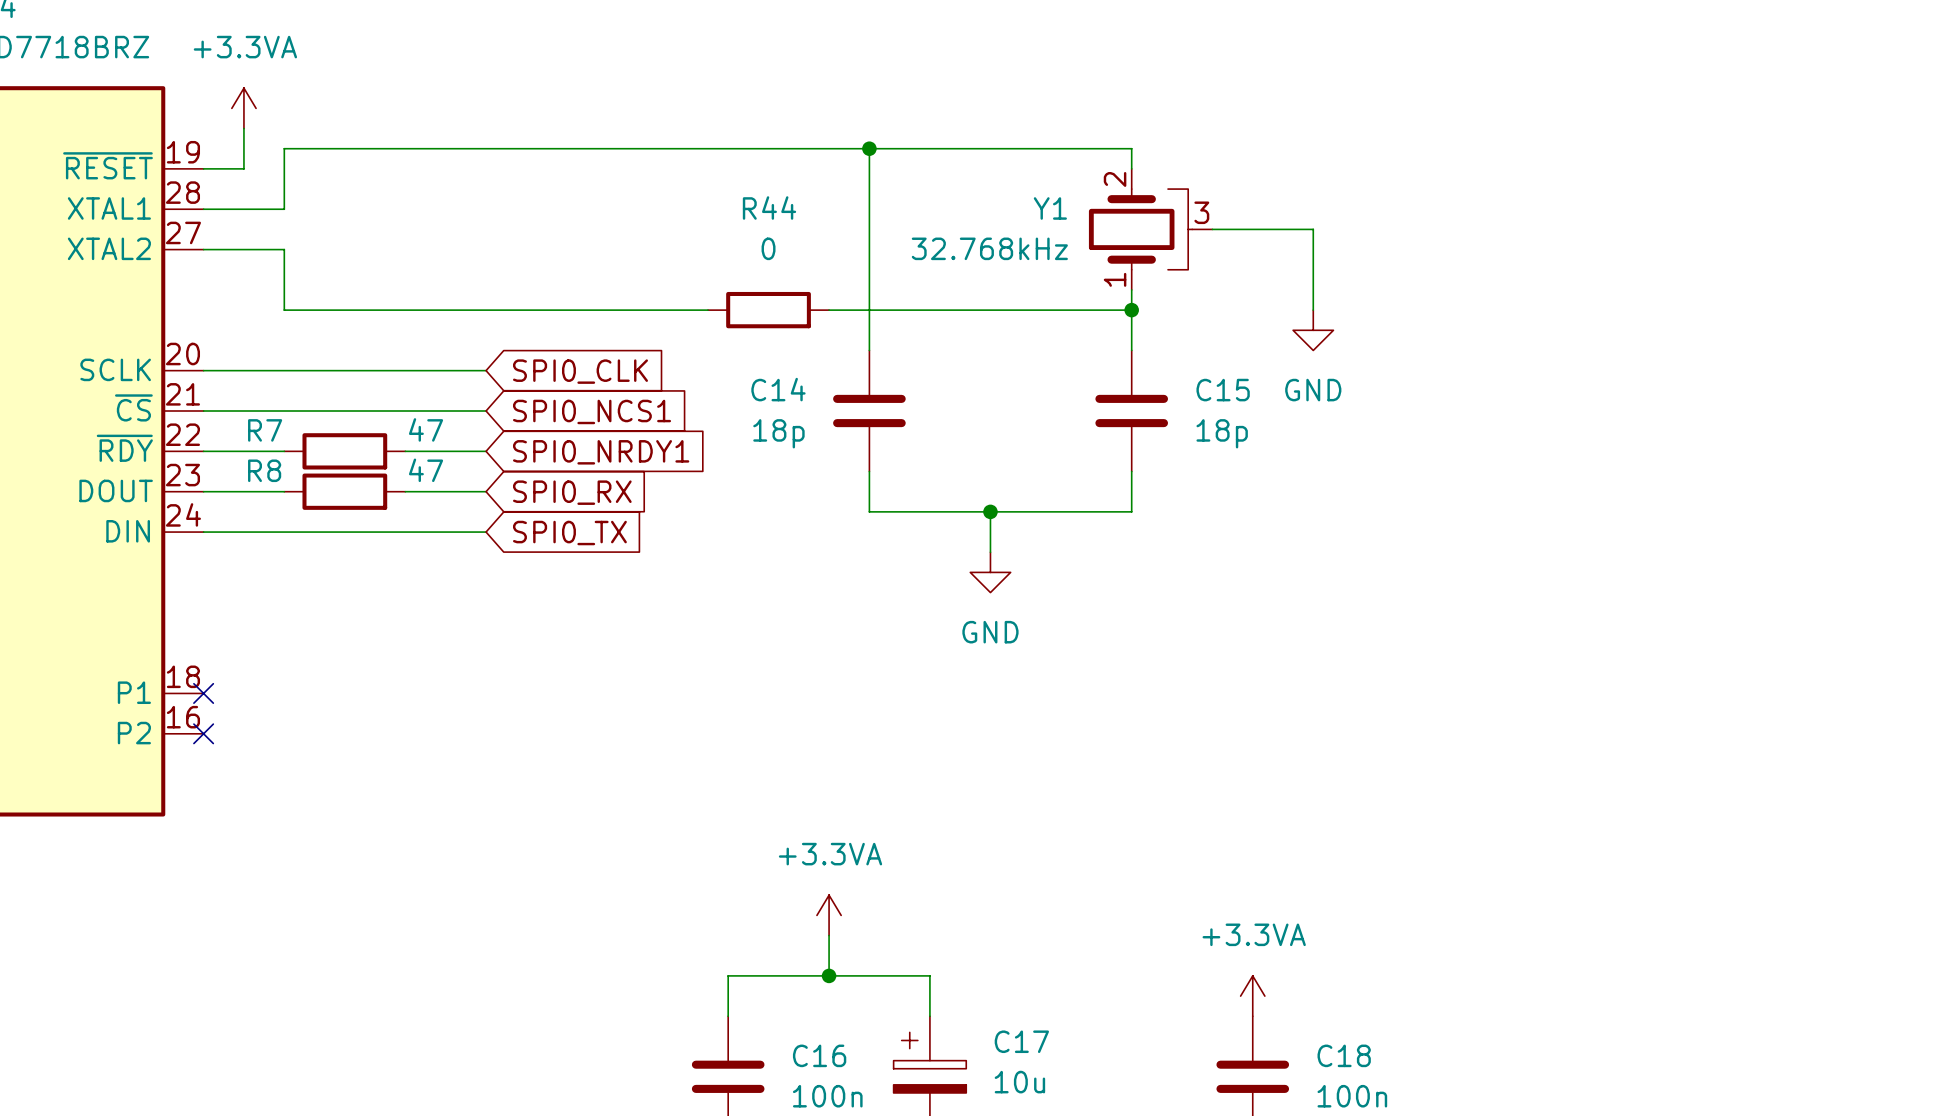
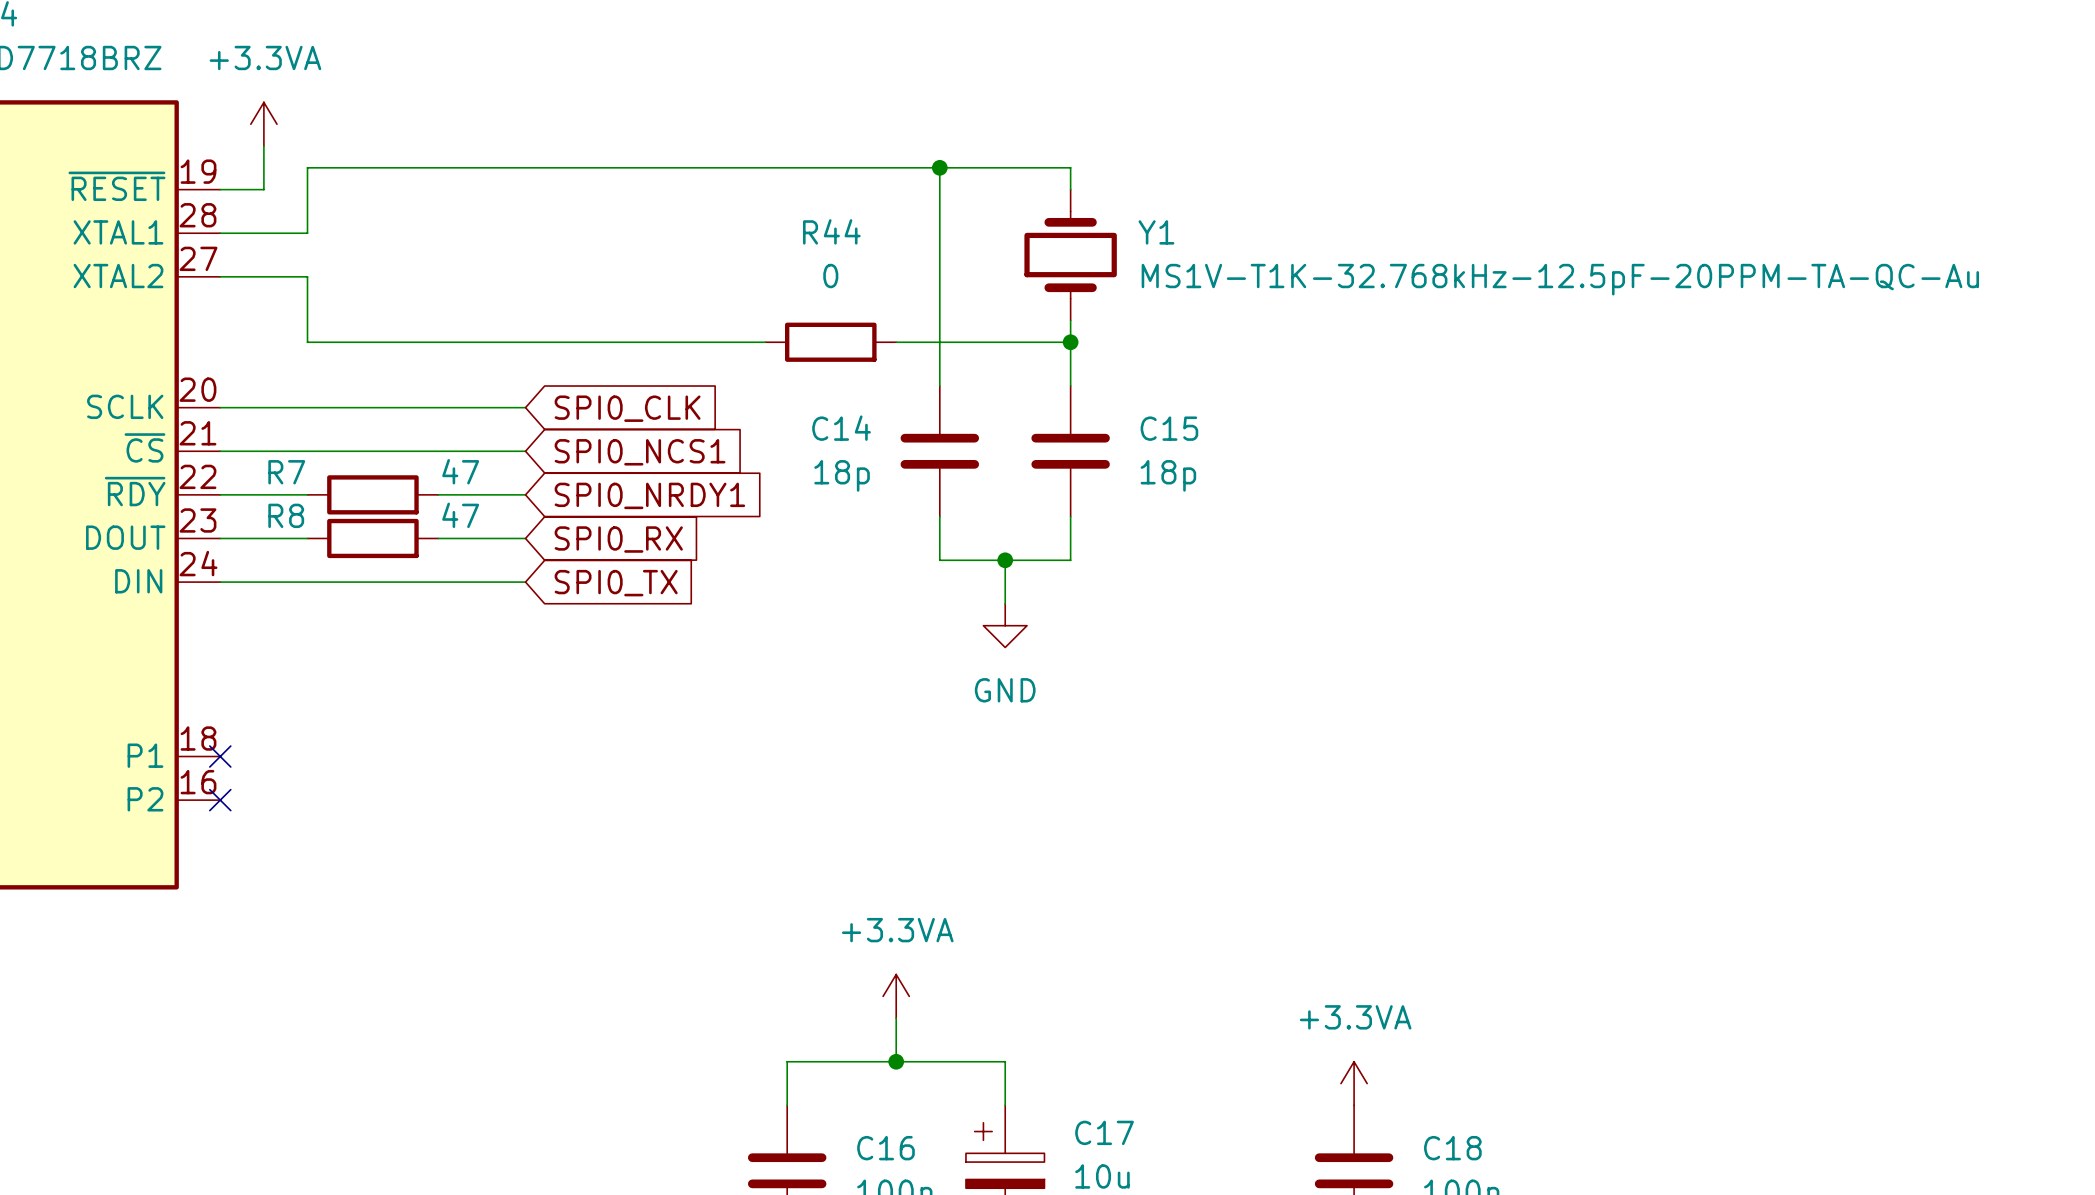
wire: (990, 148) (1131, 148) (1131, 168) -> (1070, 167) (1070, 189)
Y1 symbol: [1088, 168, 1213, 290] -> [1024, 189, 1117, 321]
Y1 name position: Y1 (1050, 208) -> Y1 (1156, 232)
wire: (1212, 229) (1313, 229) (1313, 310) -> none
Y1 value: 32.768kHz (989, 248) -> MS1V-T1K-32.768kHz-12.5pF-20PPM-TA-QC-Au (1560, 279)
wire: (1131, 289) (1131, 350) -> (1070, 320) (1070, 385)
wire: (990, 310) (1131, 310) -> none
junction: none -> (1070, 342)
junction: (1131, 310) -> none
power symbol: GND (1313, 330) -> none
C15 position: (1131, 411) -> (1070, 451)
wire: none -> (1070, 516) (1070, 560)
wire: (1131, 471) (1131, 511) (990, 511) (990, 552) -> none
wire: none -> (1005, 560) (1005, 603)
junction position: (990, 511) -> (1005, 560)
power symbol position: GND (990, 572) -> GND (1005, 625)

